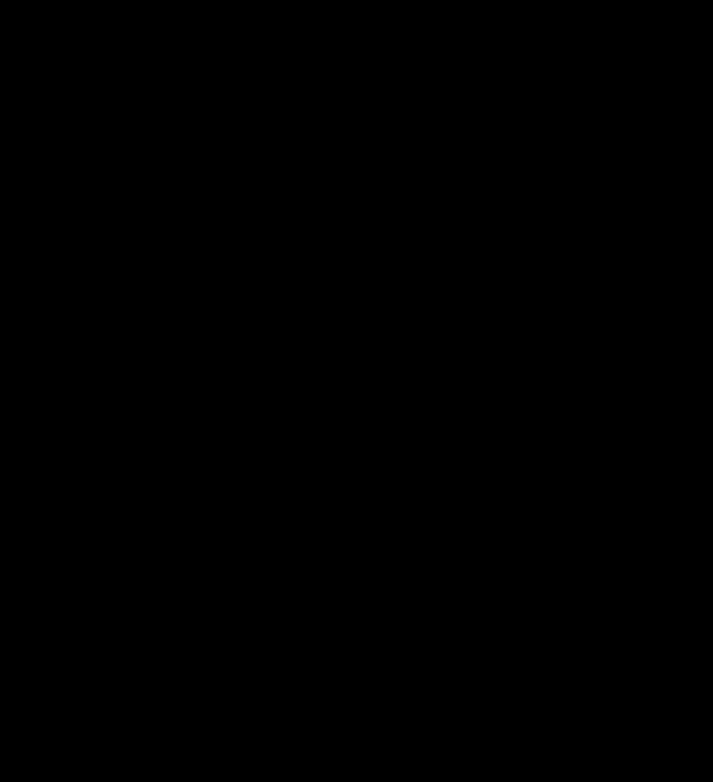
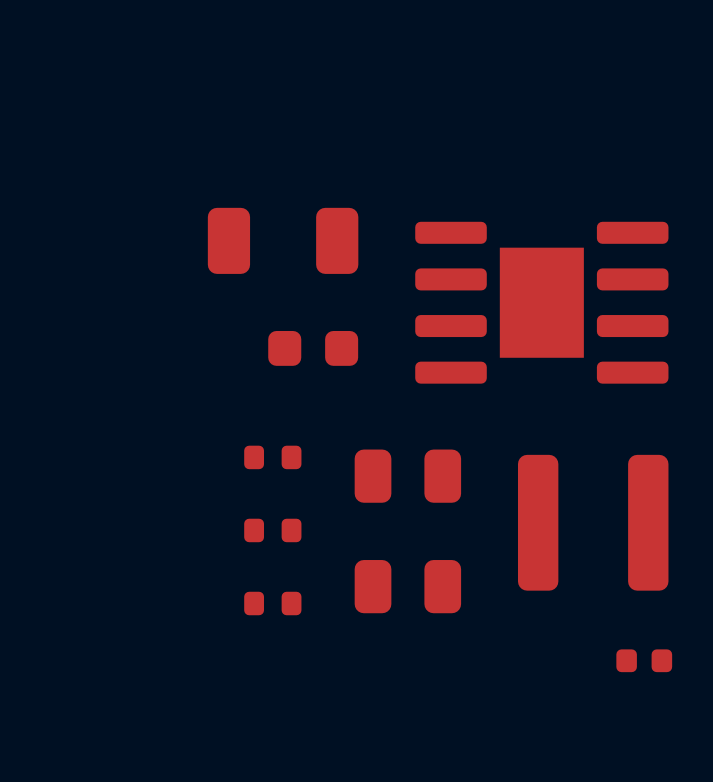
part: none -> (283, 240)
part: none -> (541, 302)
part: none -> (313, 348)
part: none -> (272, 457)
part: none -> (407, 476)
part: none -> (593, 522)
part: none -> (272, 530)
part: none -> (407, 586)
part: none -> (272, 603)
part: none -> (644, 660)

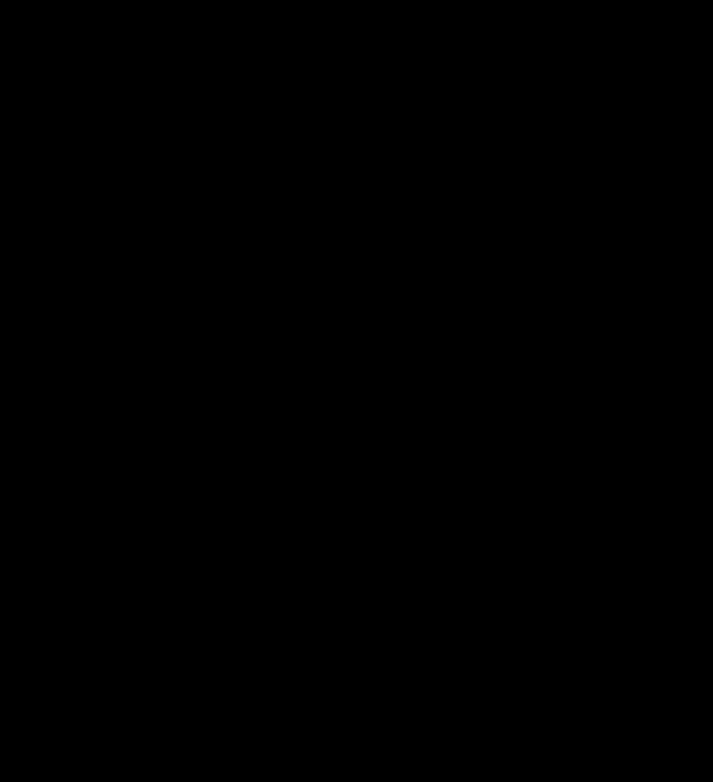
part: (283, 240) -> none
part: (541, 302) -> none
part: (313, 348) -> none
part: (272, 457) -> none
part: (407, 476) -> none
part: (593, 522) -> none
part: (272, 530) -> none
part: (407, 586) -> none
part: (272, 603) -> none
part: (644, 660) -> none

